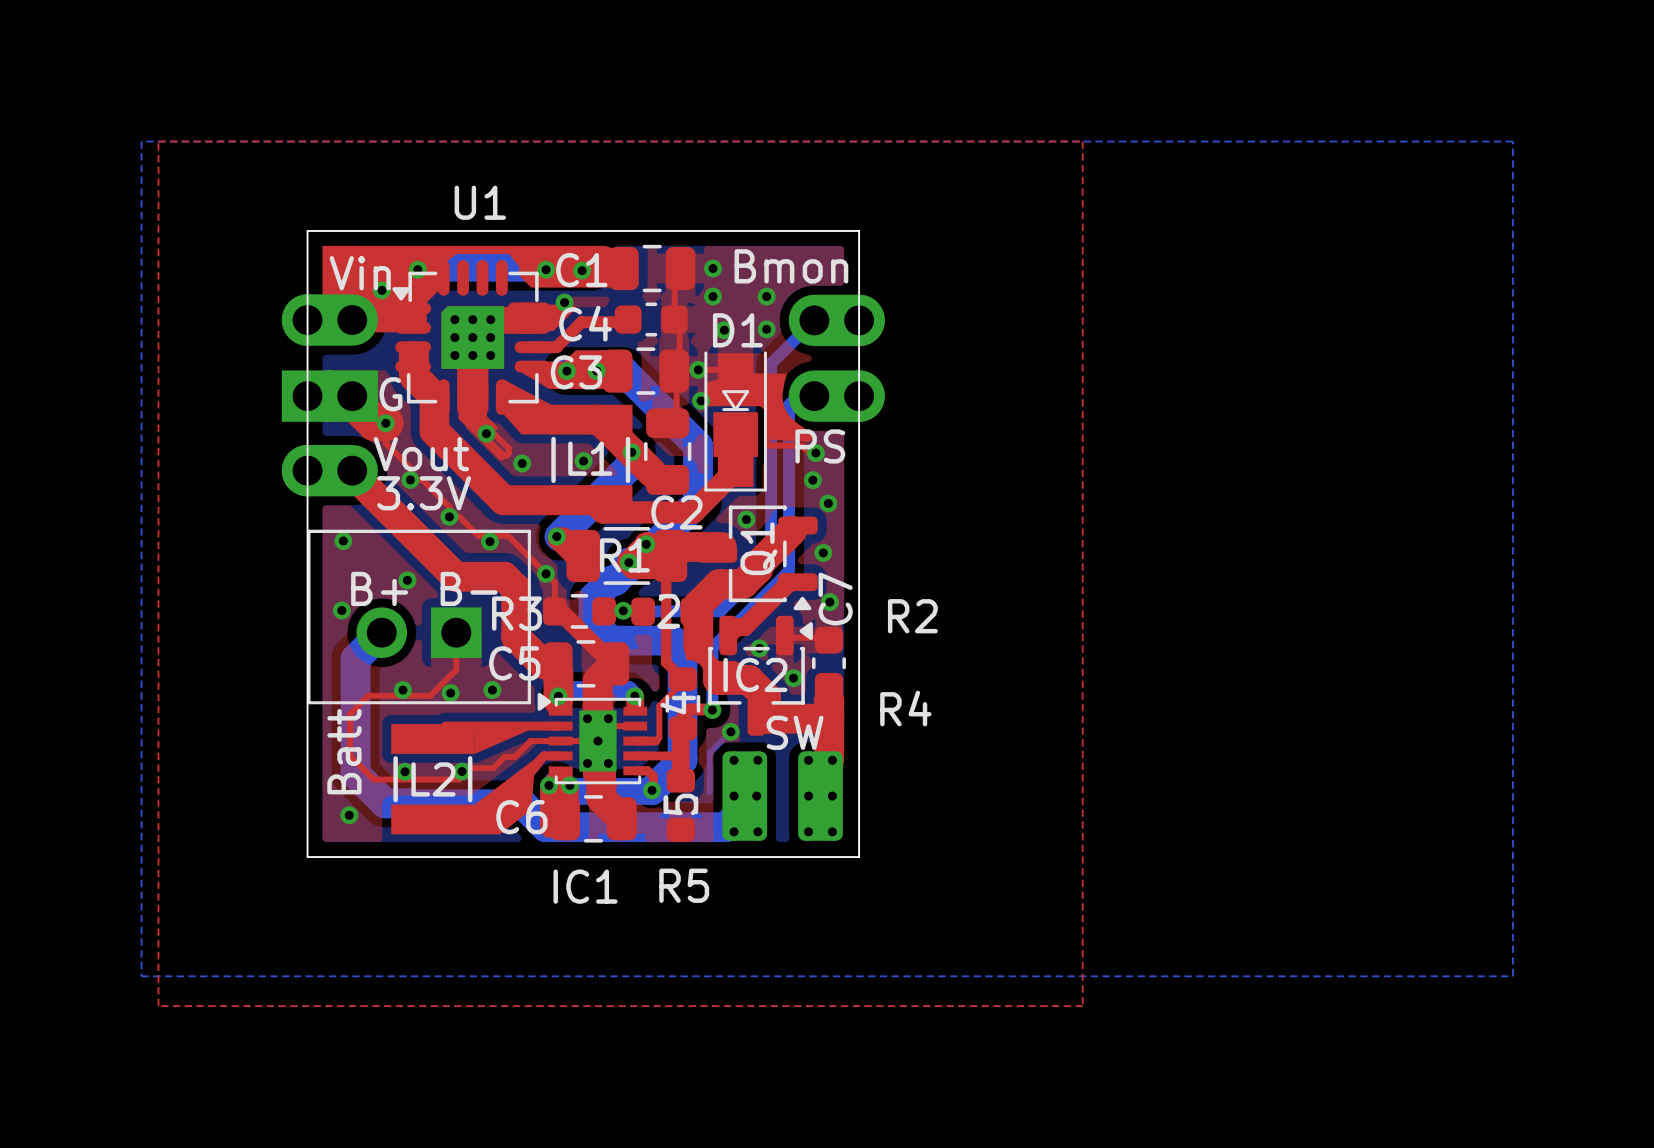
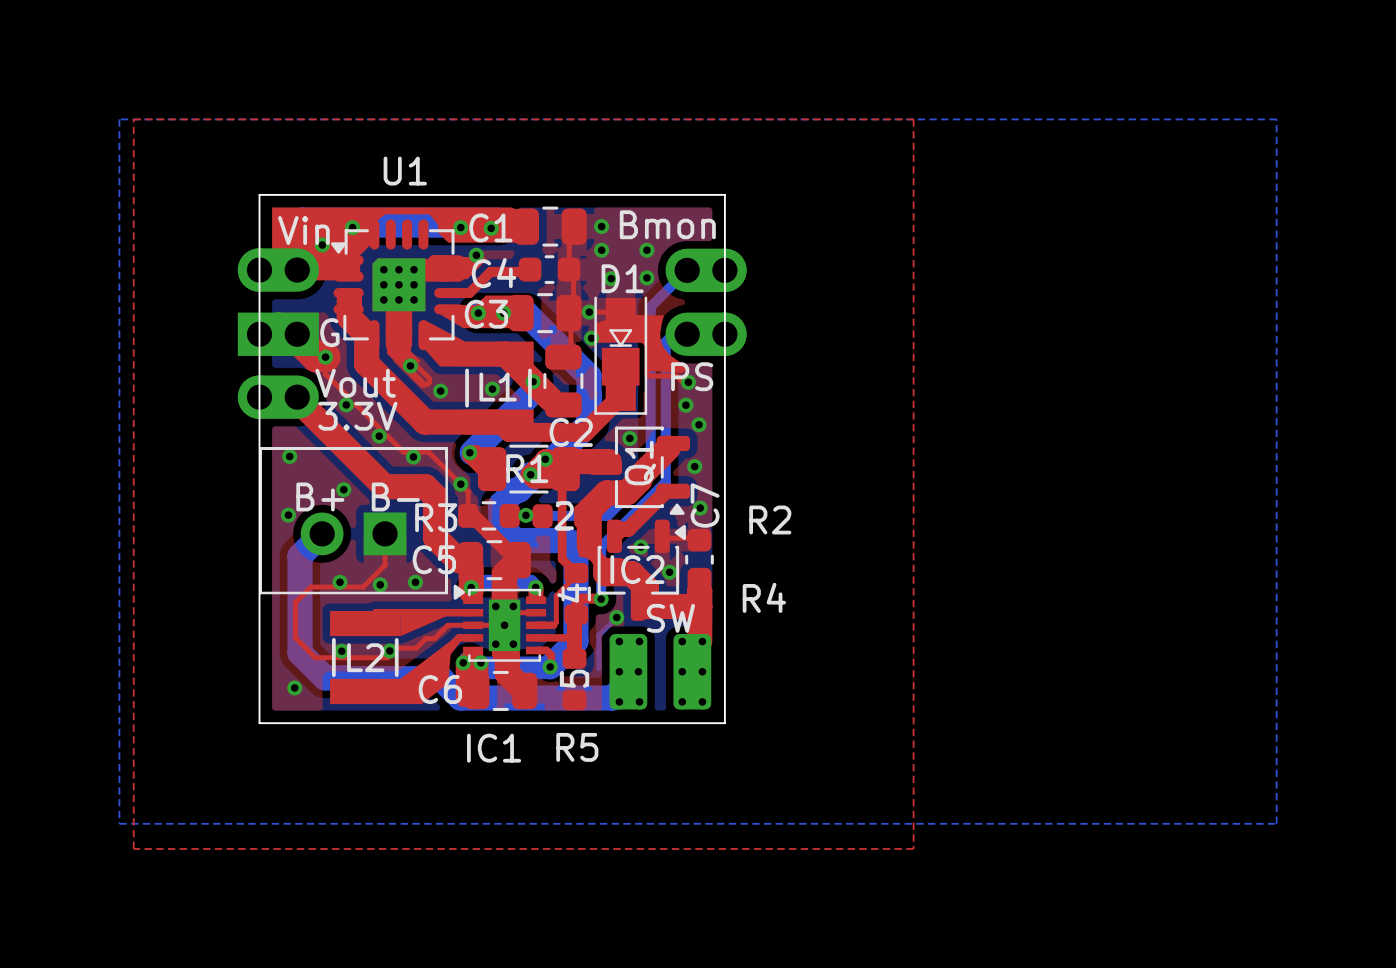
part text: Batt (344, 751) -> none

